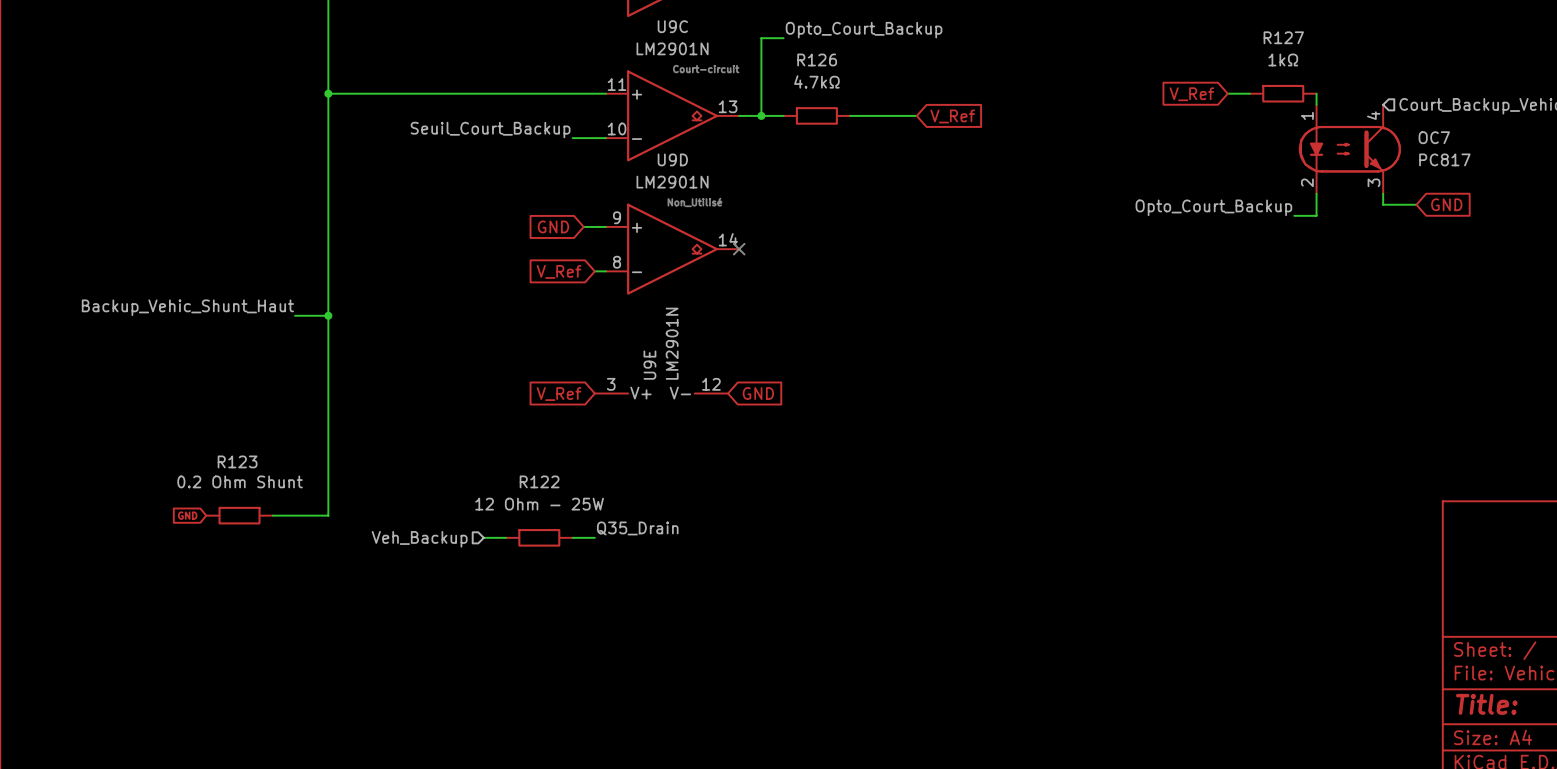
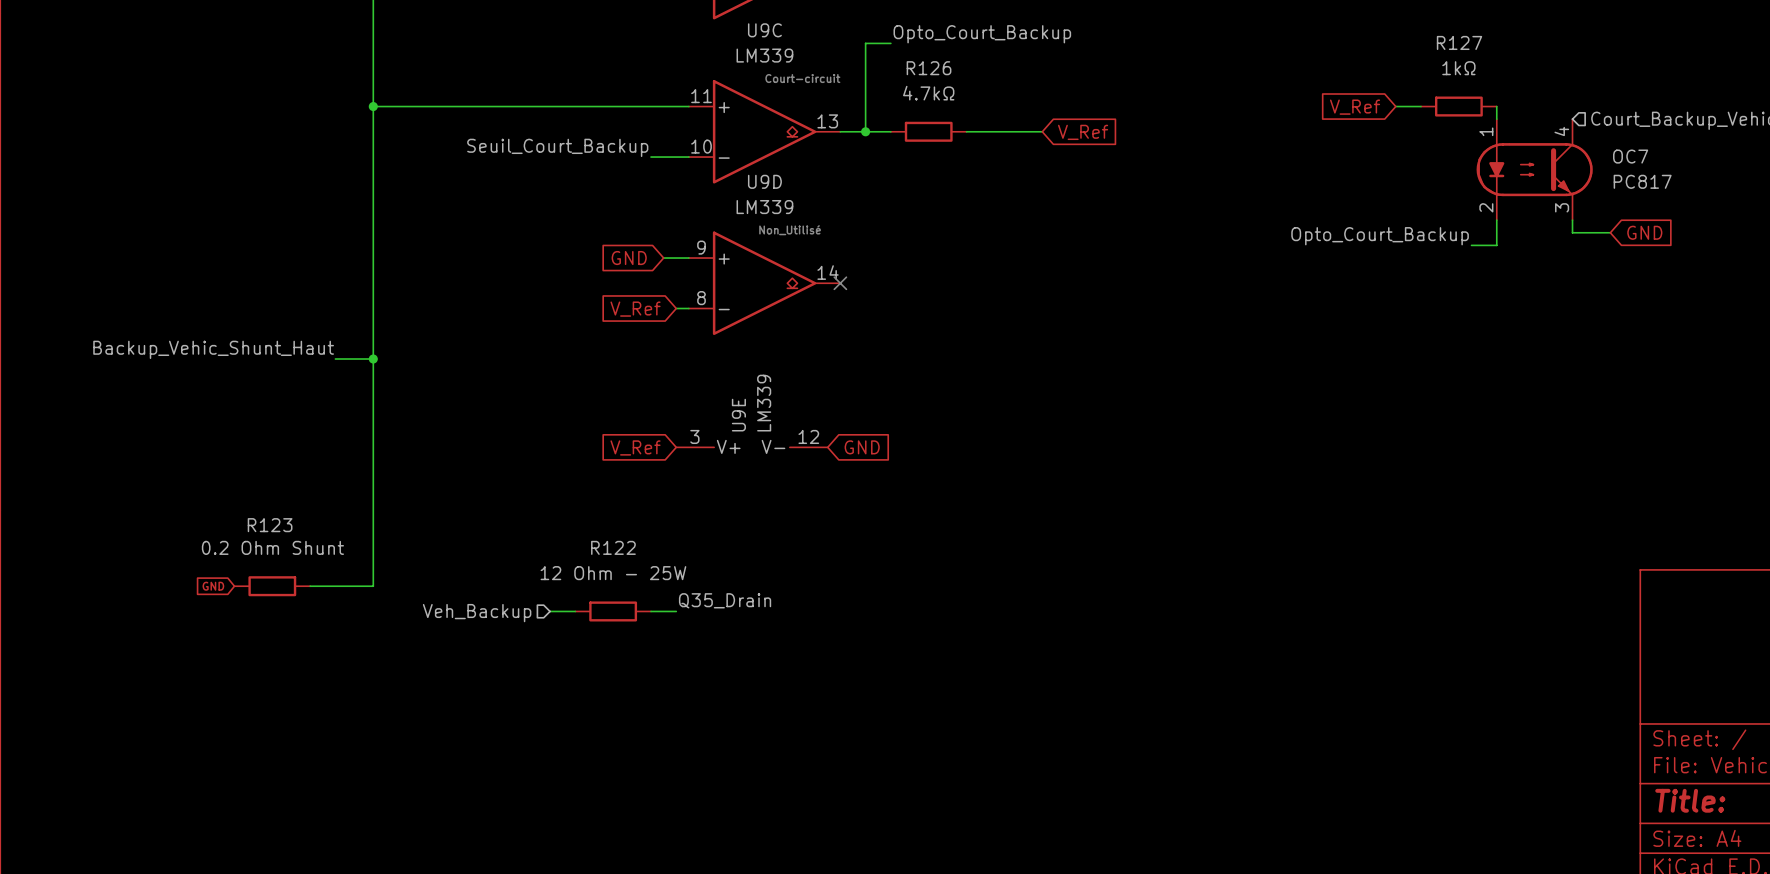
U9C value: LM2901N (672, 48) -> LM339 (764, 55)
U9D value: LM2901N (672, 182) -> LM339 (764, 207)
U9E value: LM2901N (672, 343) -> LM339 (764, 403)

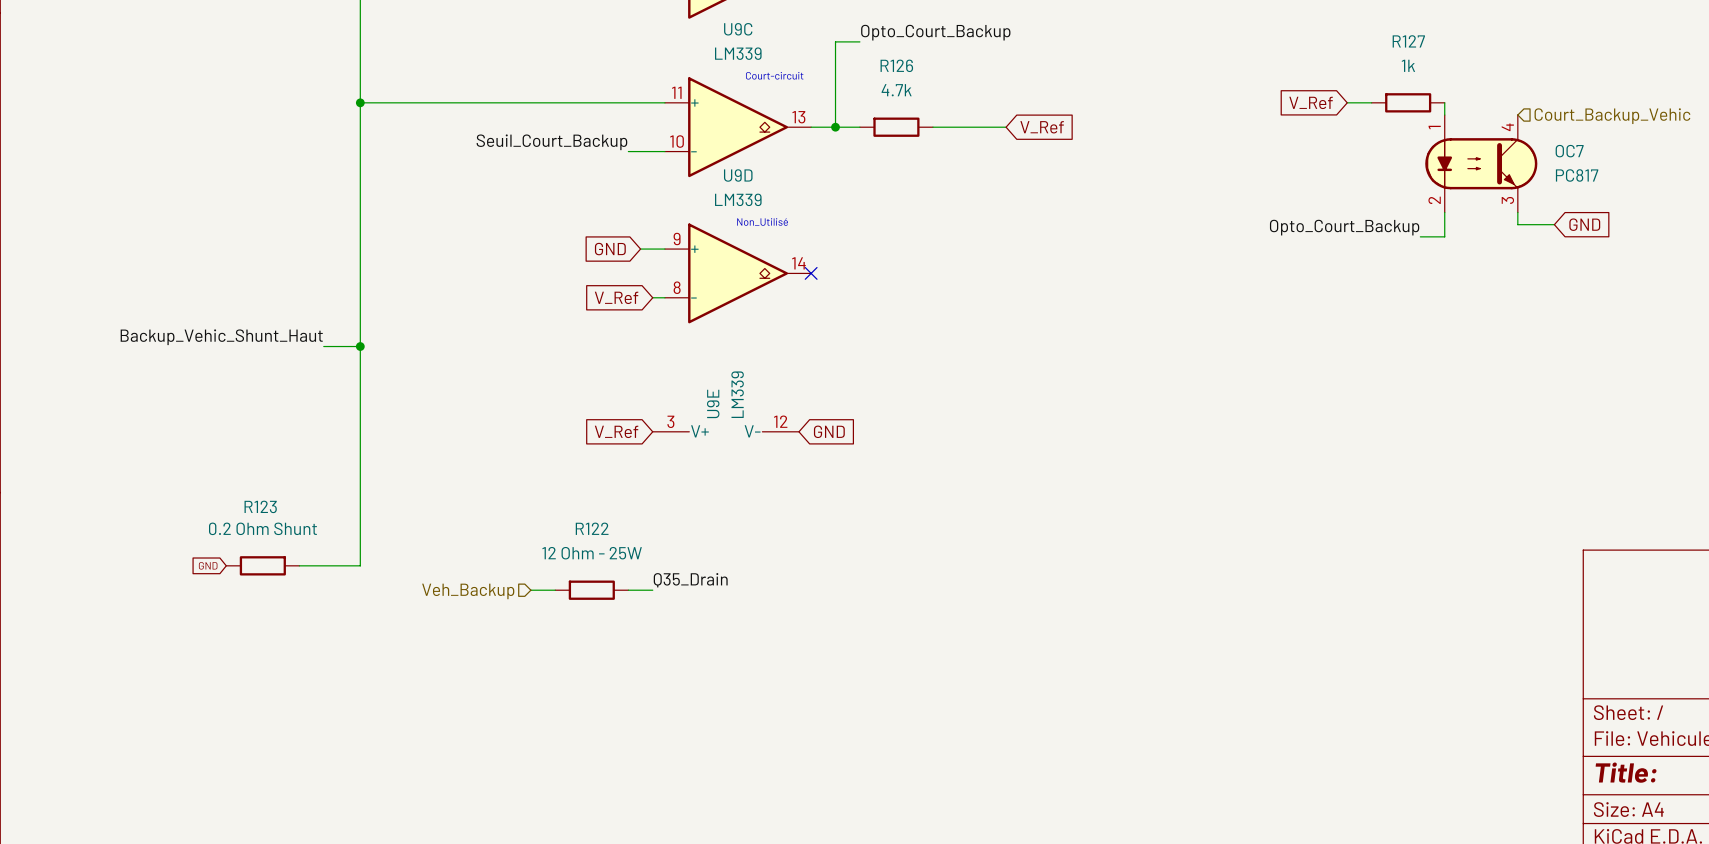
R127 value: 1kΩ (1458, 68) -> 1k (1408, 65)
R126 value: 4.7kΩ (928, 93) -> 4.7k (896, 90)

